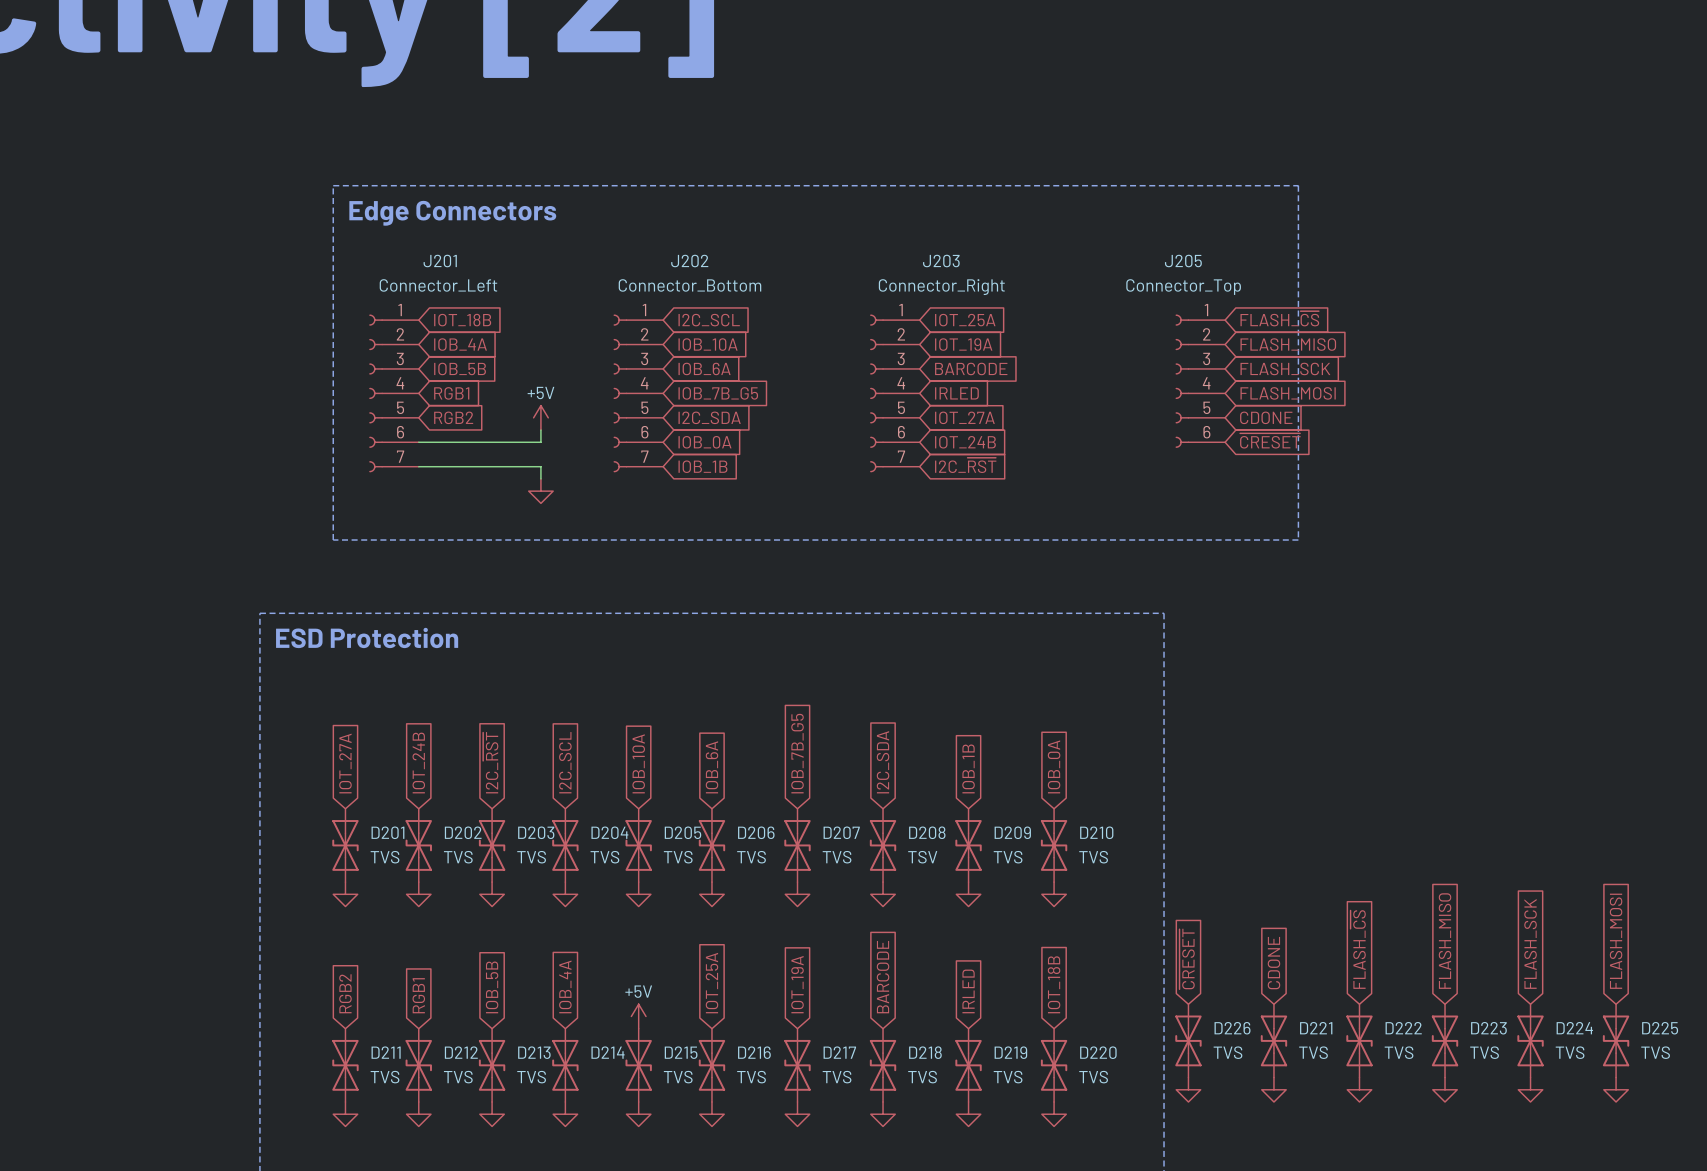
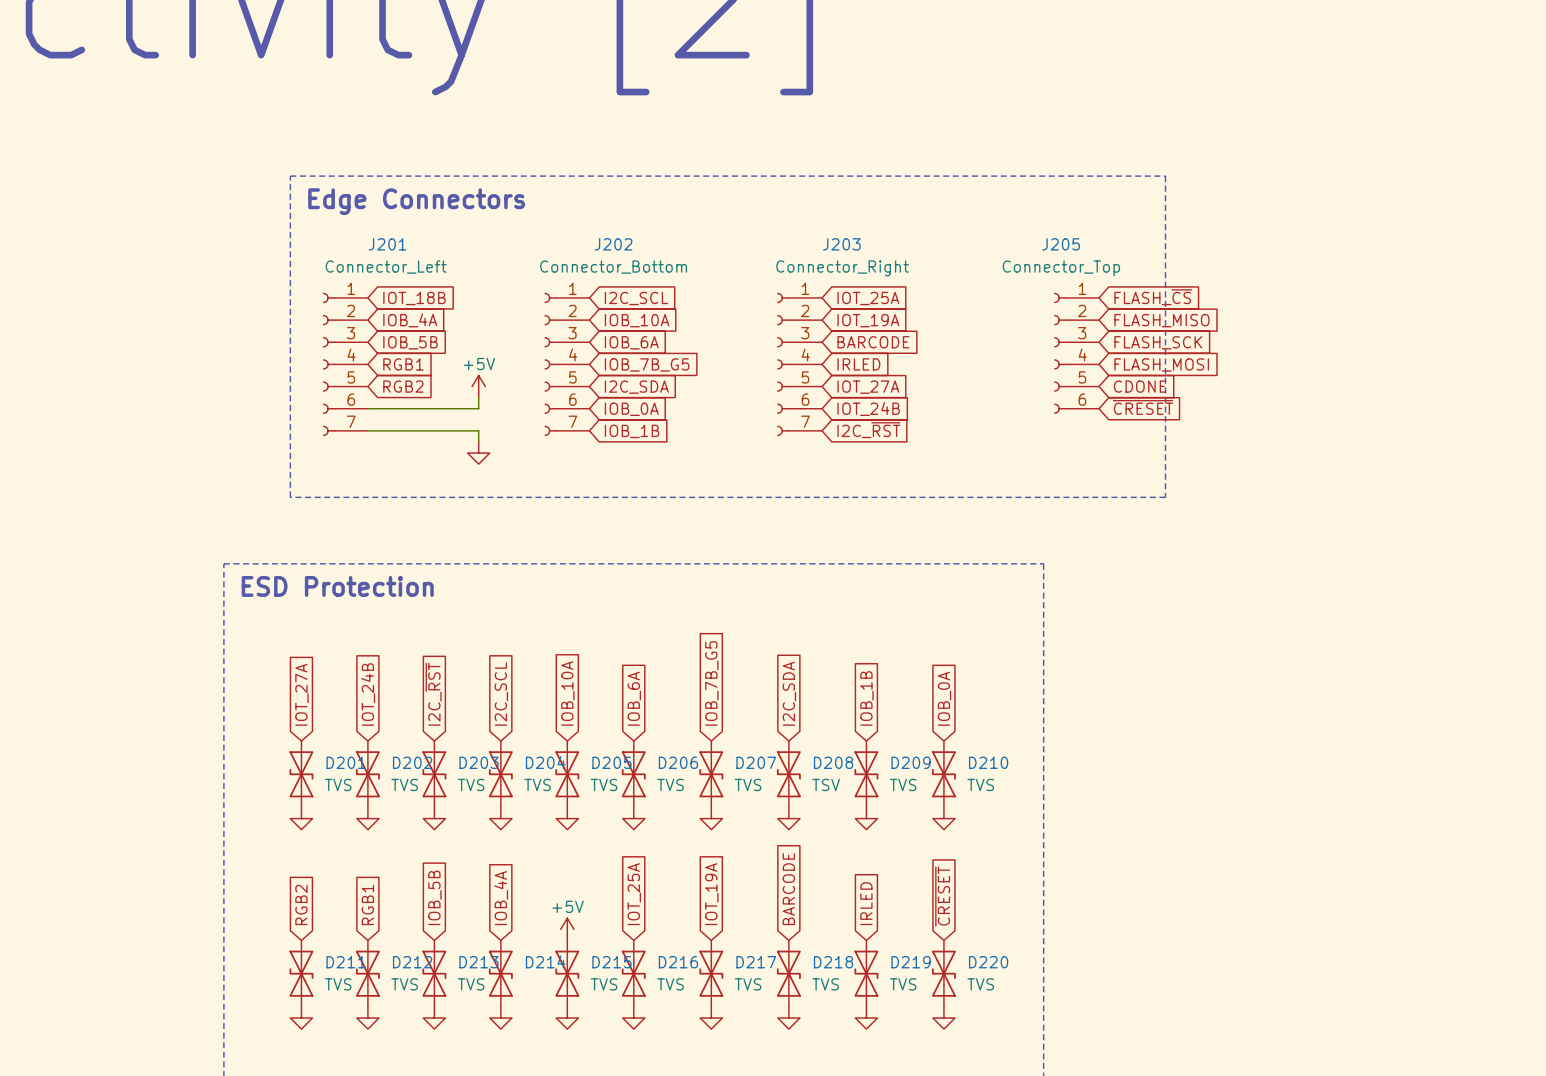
global label: FLASH_MISO (1445, 941) -> none
global label: FLASH_MOSI (1616, 941) -> none
global label: FLASH_SCK (1530, 943) -> none
global label: FLASH_~{CS} (1358, 949) -> none
global label: ~{CRESET} (1187, 959) -> none
global label: CDONE (1273, 963) -> none
global label: IOT_18B (1054, 984) -> ~{CRESET} (942, 896)
D226: TVS (1188, 1040) -> none
D221: TVS (1273, 1040) -> none
D222: TVS (1359, 1040) -> none
D223: TVS (1445, 1040) -> none
D224: TVS (1530, 1040) -> none
D225: TVS (1616, 1040) -> none
power symbol: (1188, 1089) -> none
power symbol: (1273, 1089) -> none
power symbol: (1359, 1089) -> none
power symbol: (1445, 1089) -> none
power symbol: (1530, 1089) -> none
power symbol: (1616, 1089) -> none

